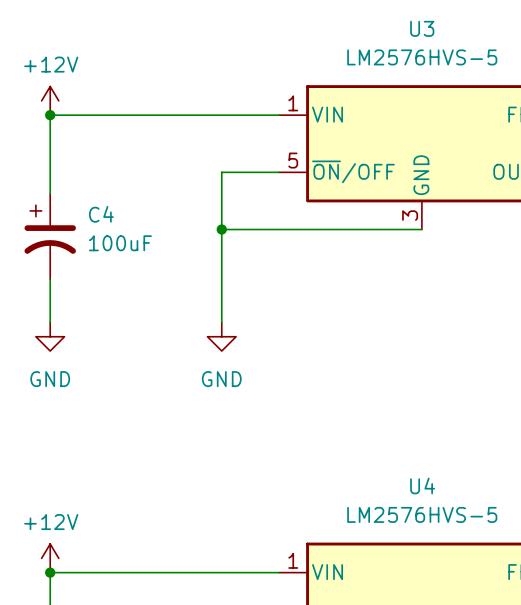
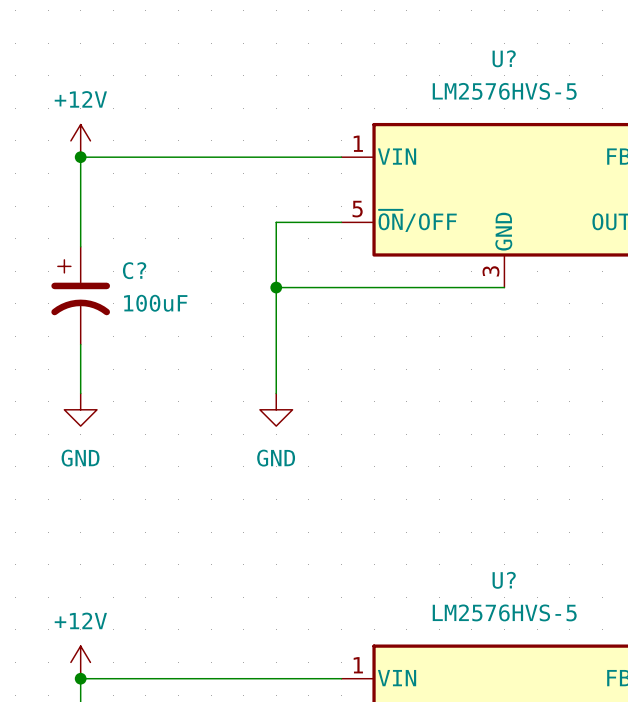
U3 name: U3 (422, 28) -> U? (504, 58)
C4 name: C4 (101, 214) -> C? (134, 270)
U4 name: U4 (422, 485) -> U? (504, 580)

